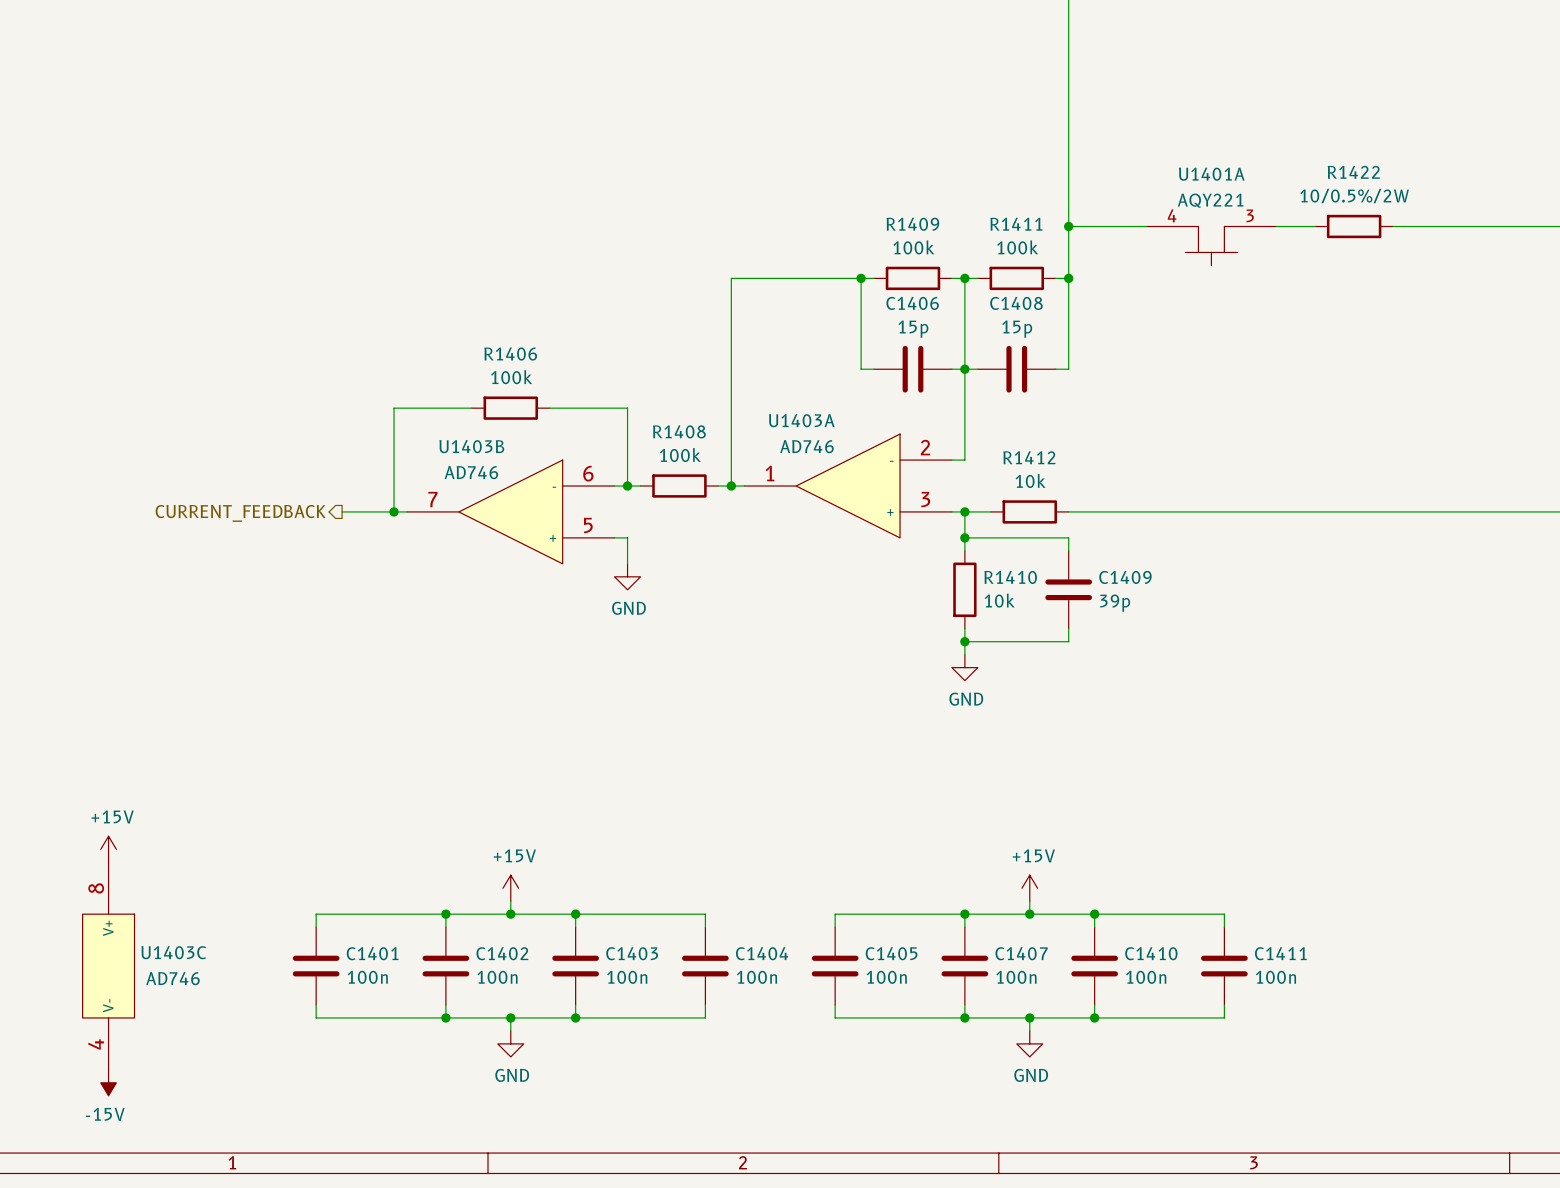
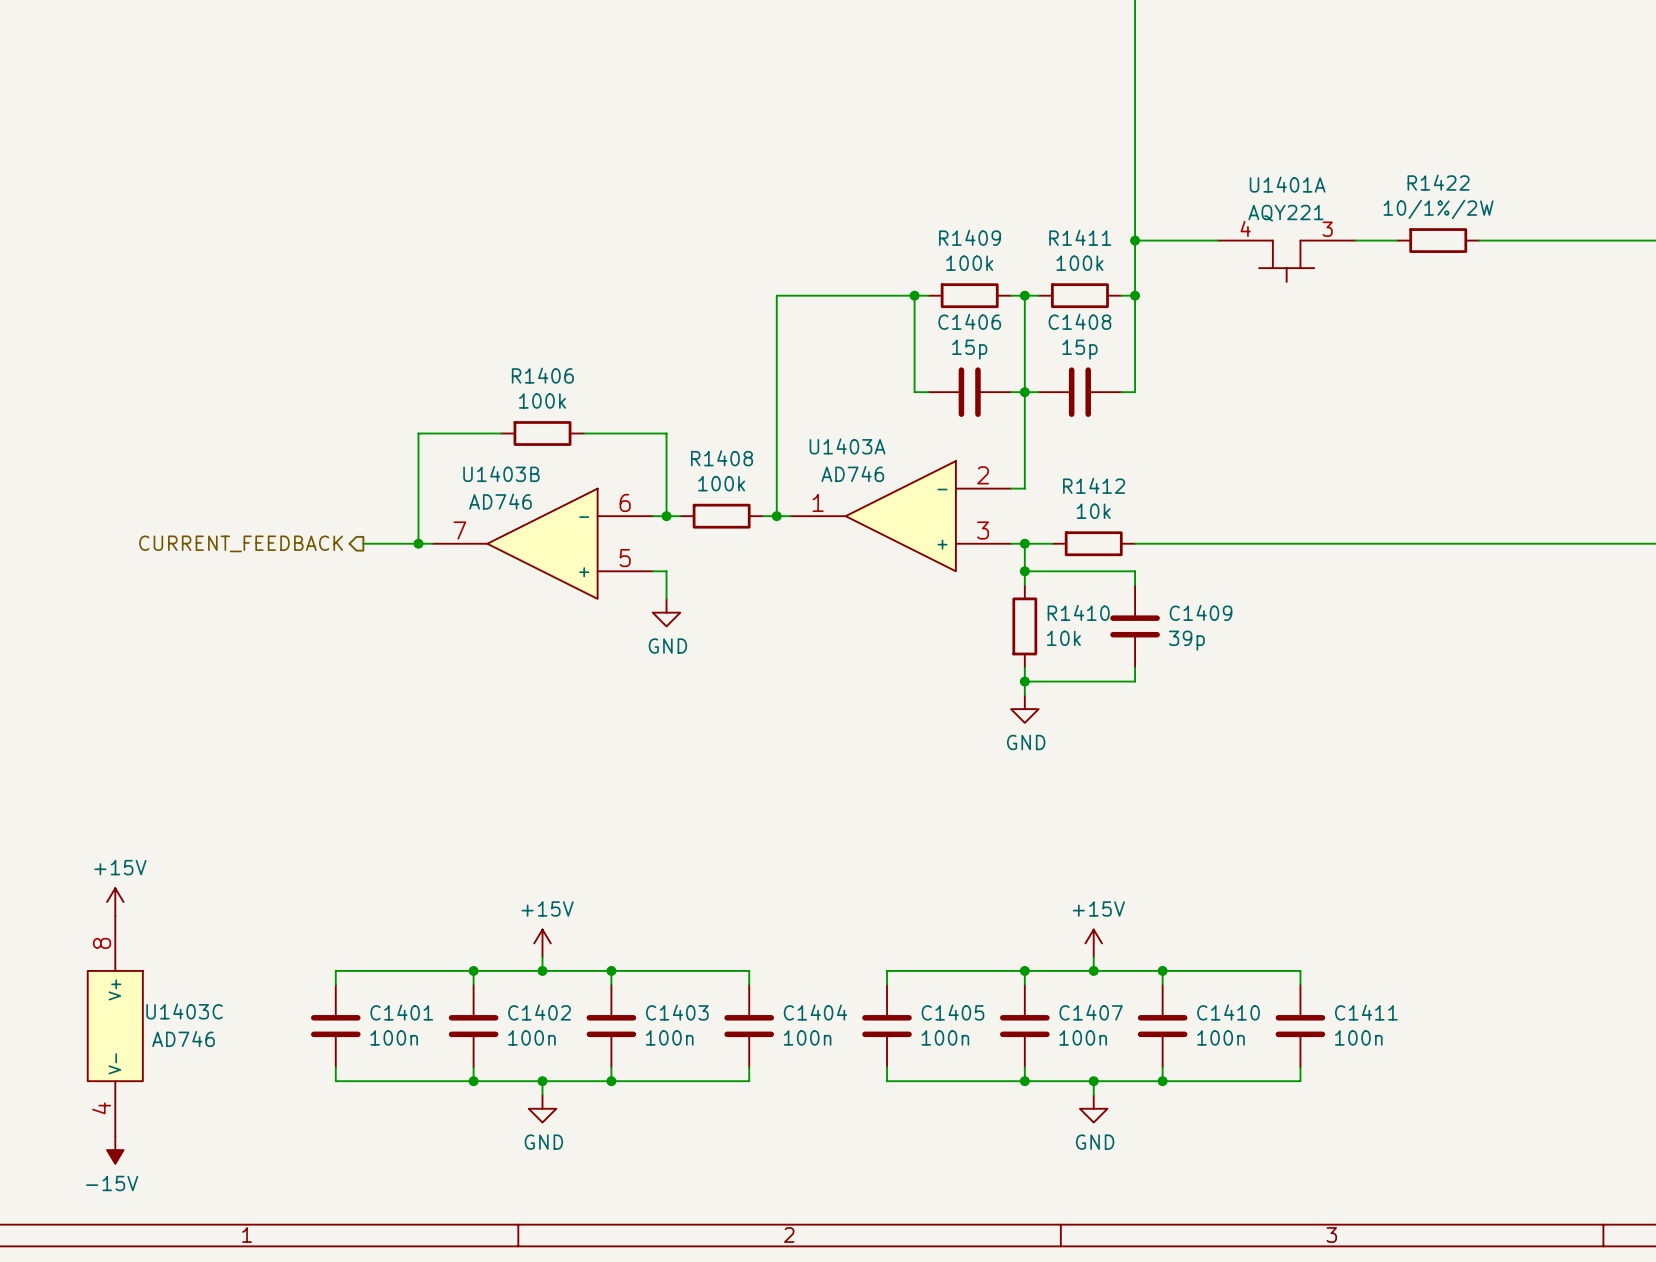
R1422 value: 10/0.5%/2W (1354, 196) -> 10/1%/2W (1438, 209)

